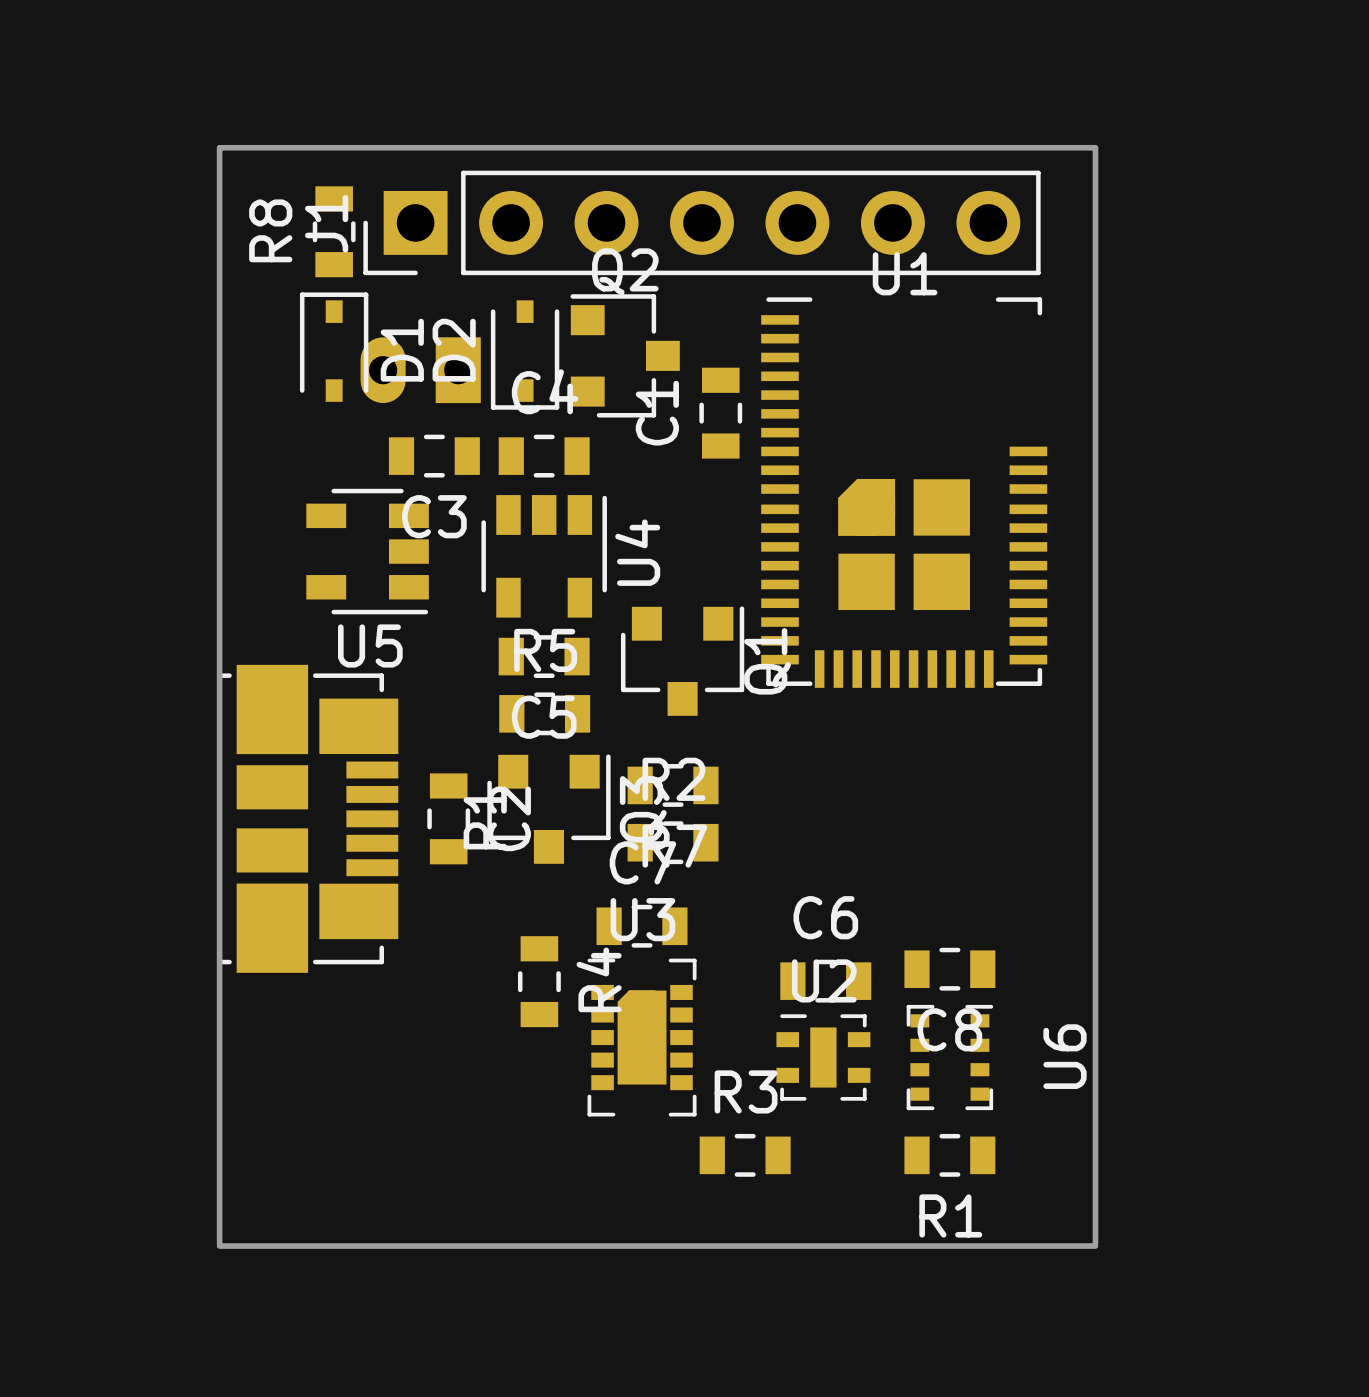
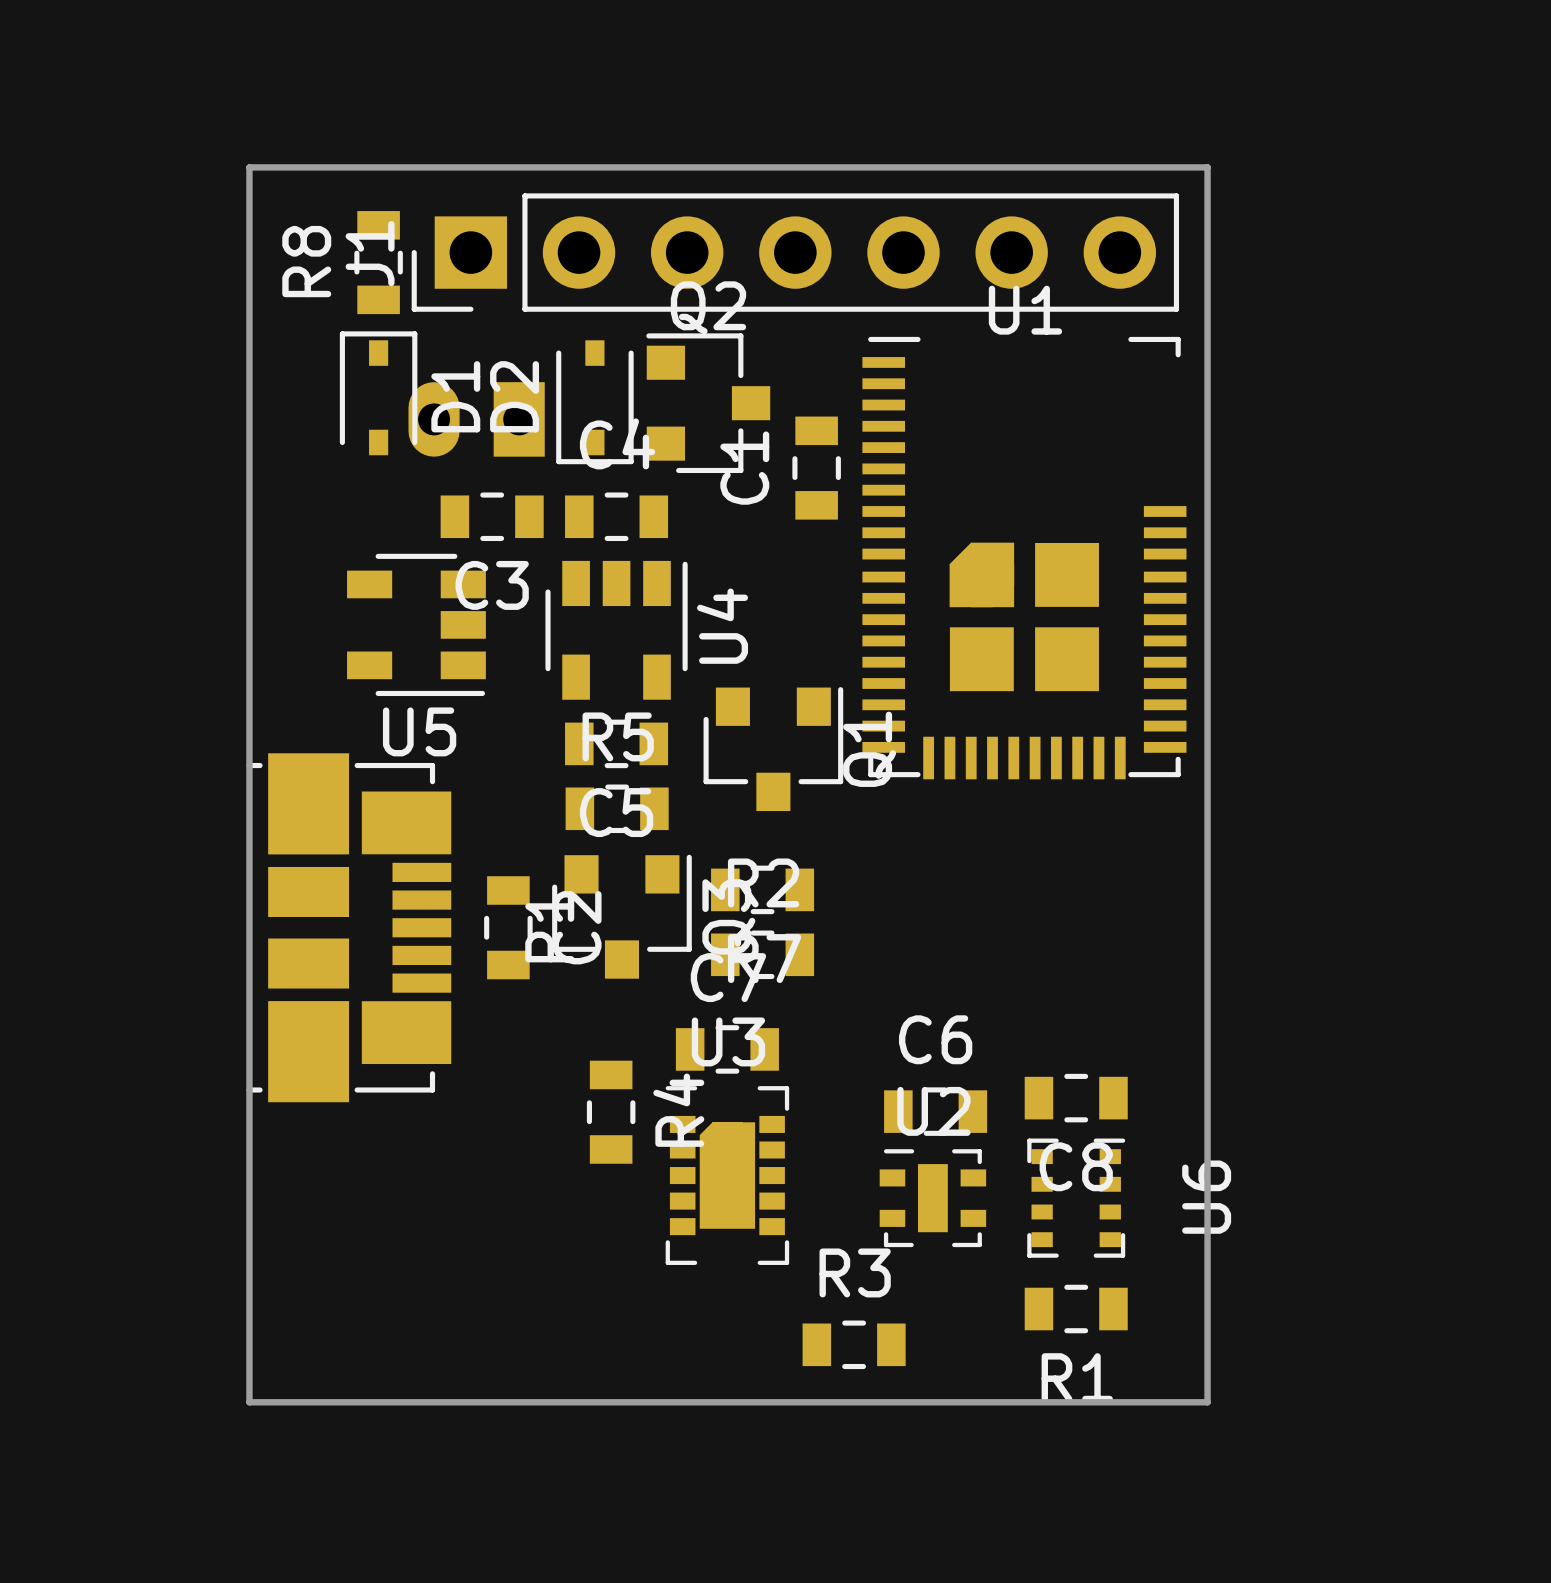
board edge: (1065, 147) (1095, 147) -> (1207, 167) (1207, 1402) (249, 1402) (249, 167)
board edge: (219, 148) (219, 1243) -> none
board edge: (1095, 148) (1095, 1243) -> none
R3 position: (745, 1155) -> (854, 1344)
board edge: (219, 1246) (1095, 1246) -> none

